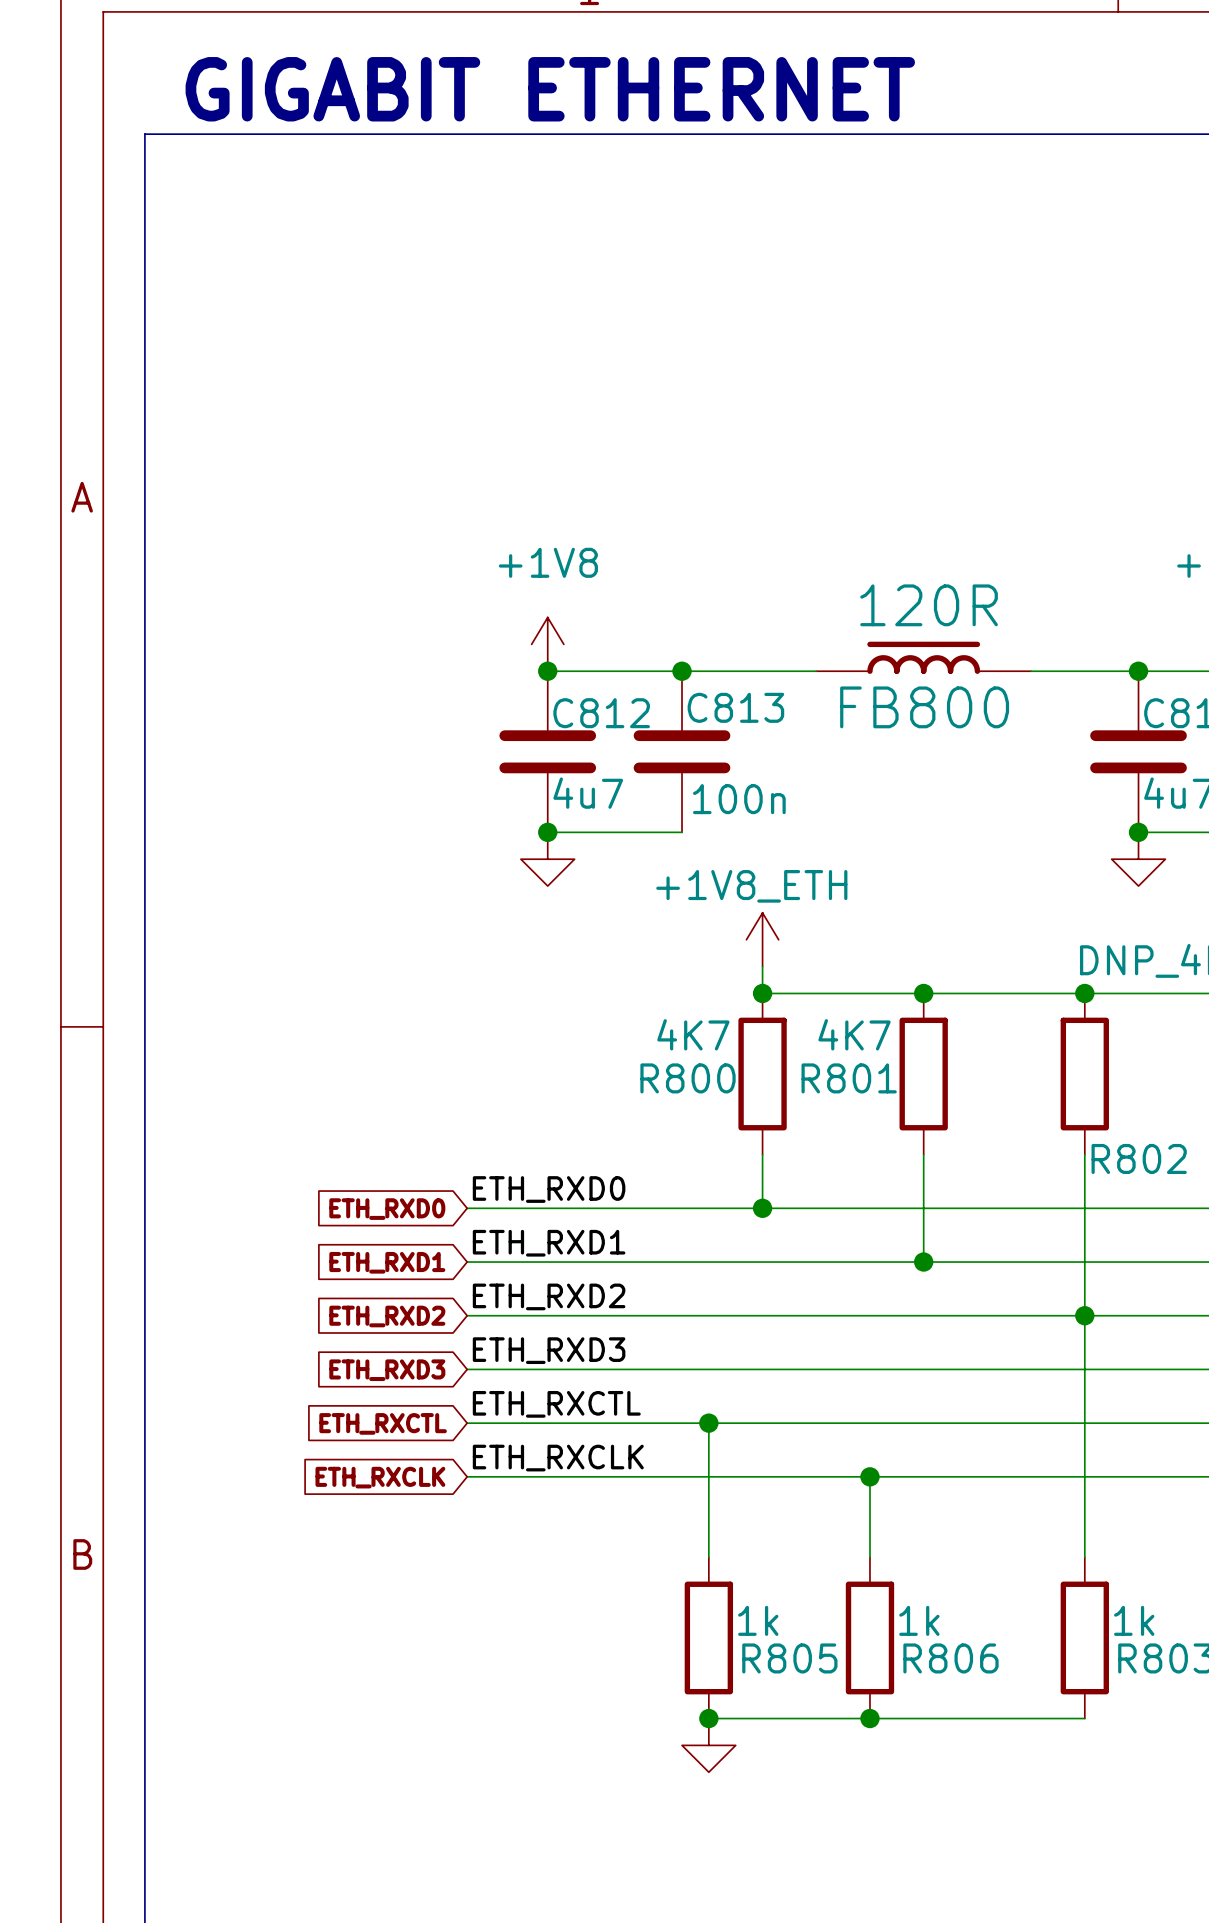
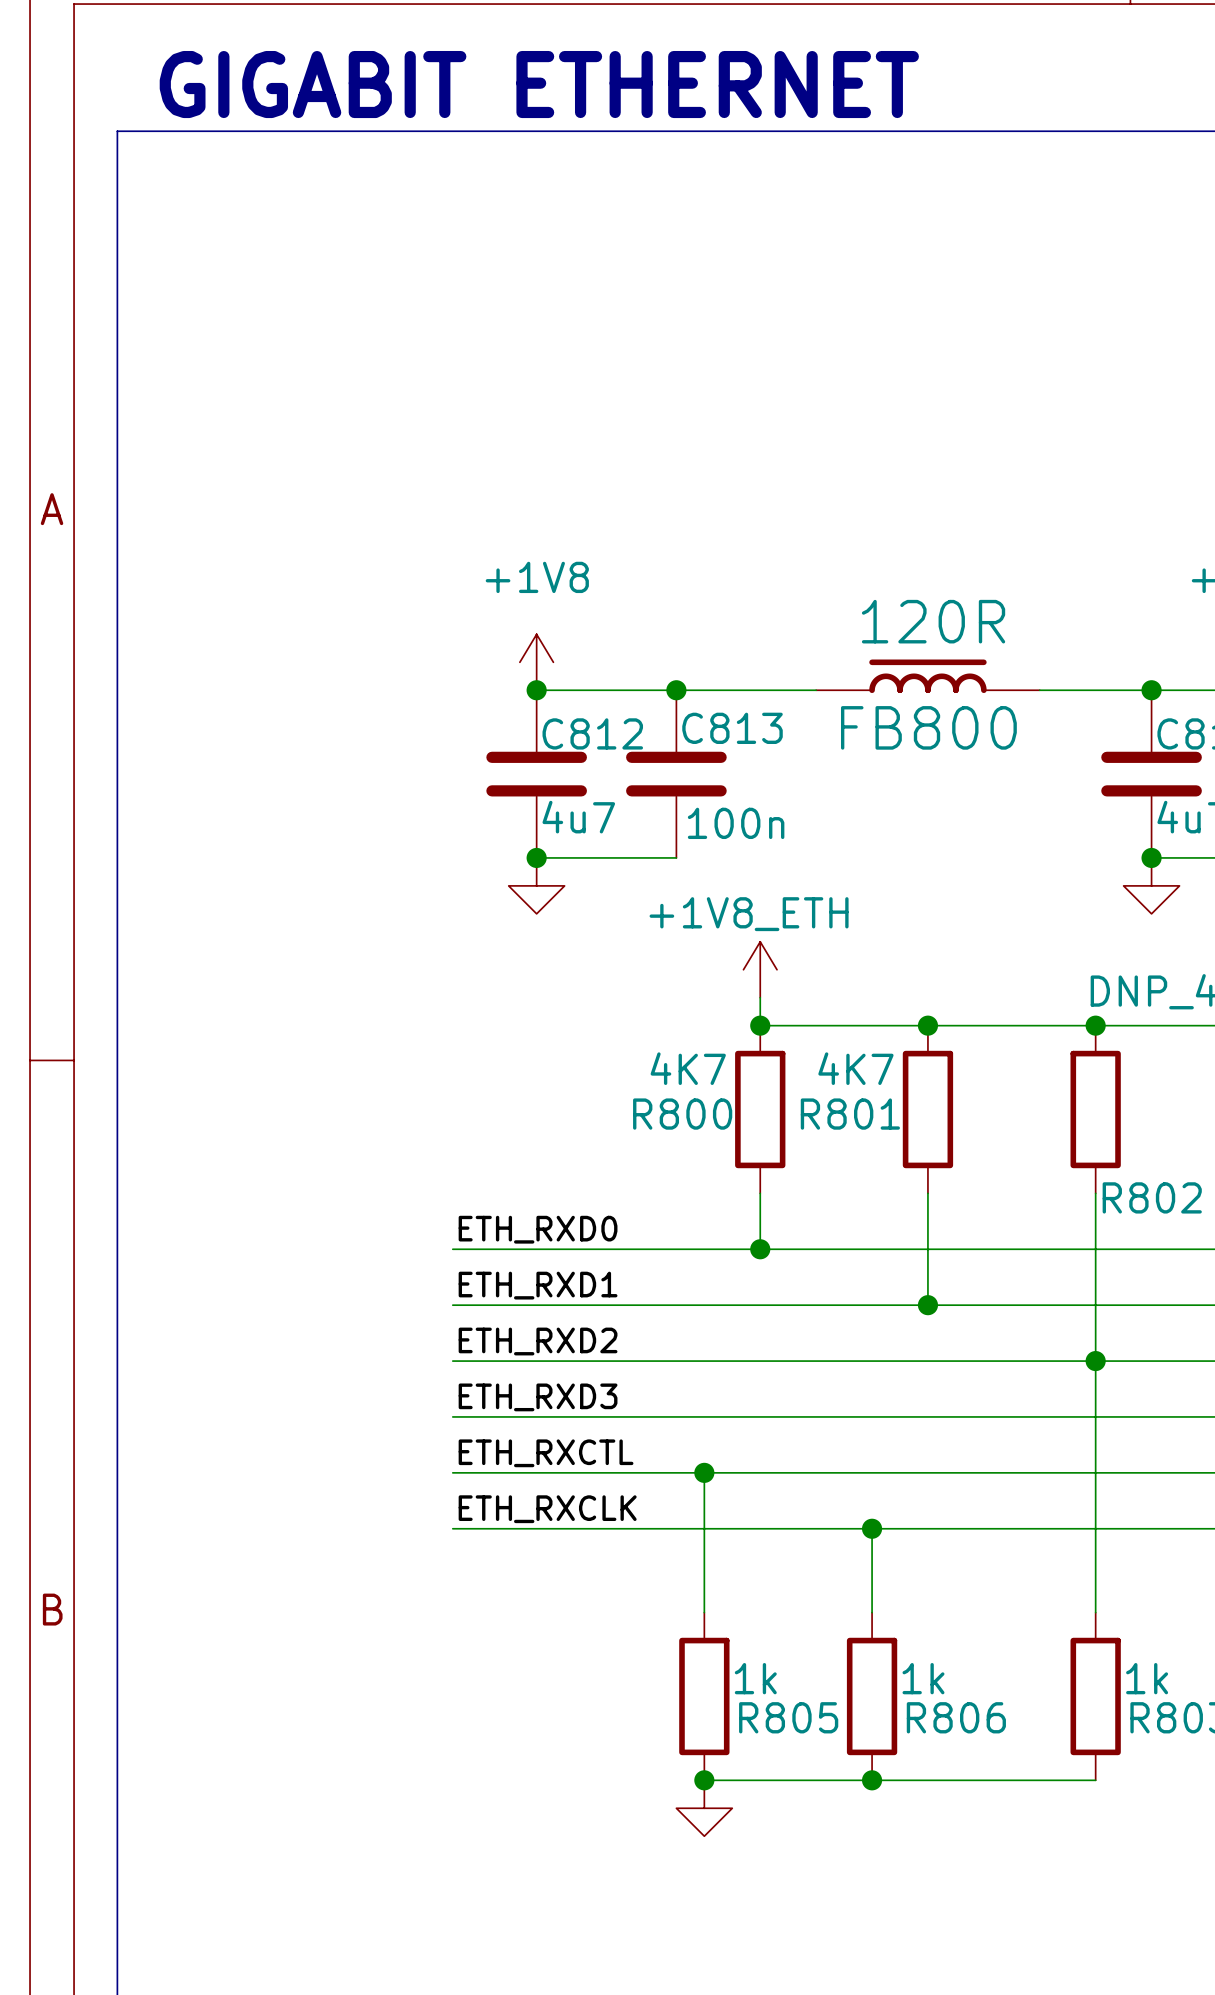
global label: ETH_RXD0 (387, 1209) -> none
global label: ETH_RXD1 (387, 1262) -> none
global label: ETH_RXD2 (387, 1316) -> none
global label: ETH_RXD3 (387, 1370) -> none
global label: ETH_RXCTL (383, 1423) -> none
global label: ETH_RXCLK (380, 1477) -> none

